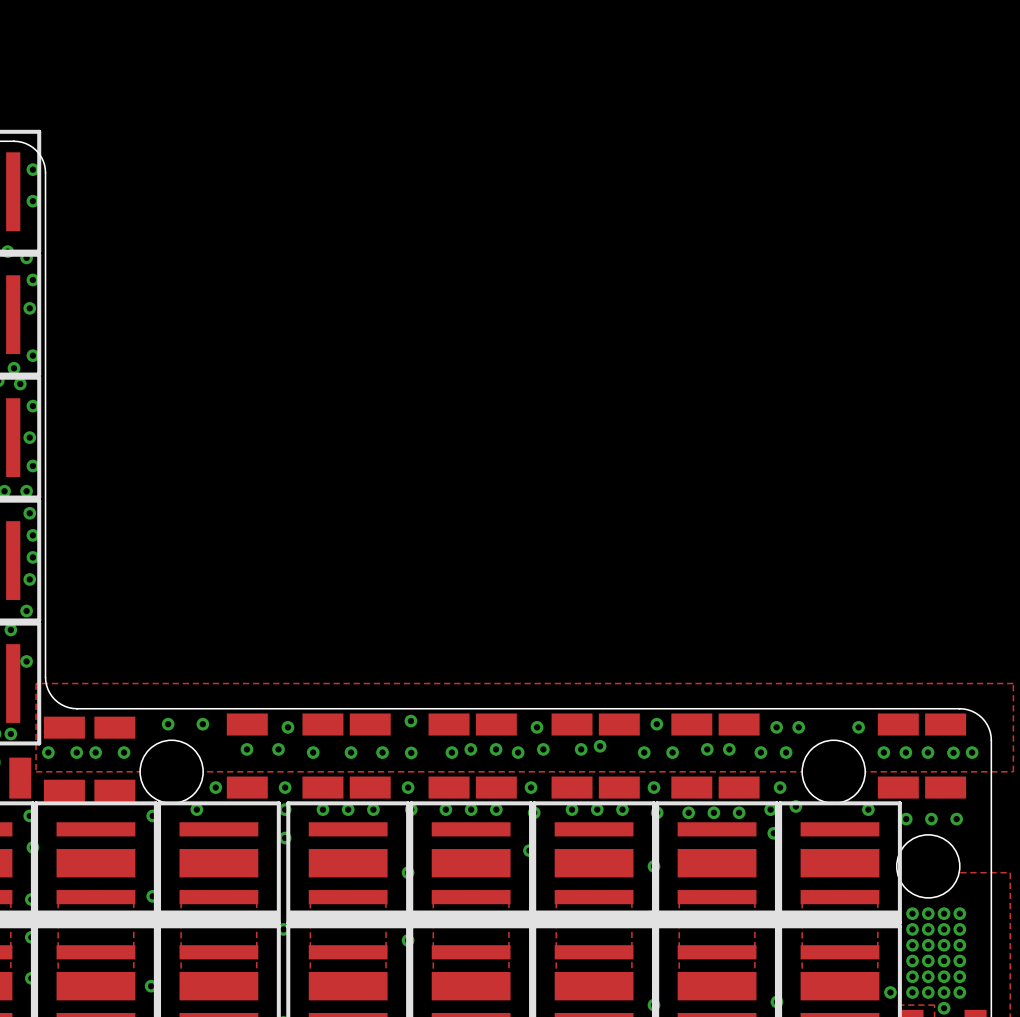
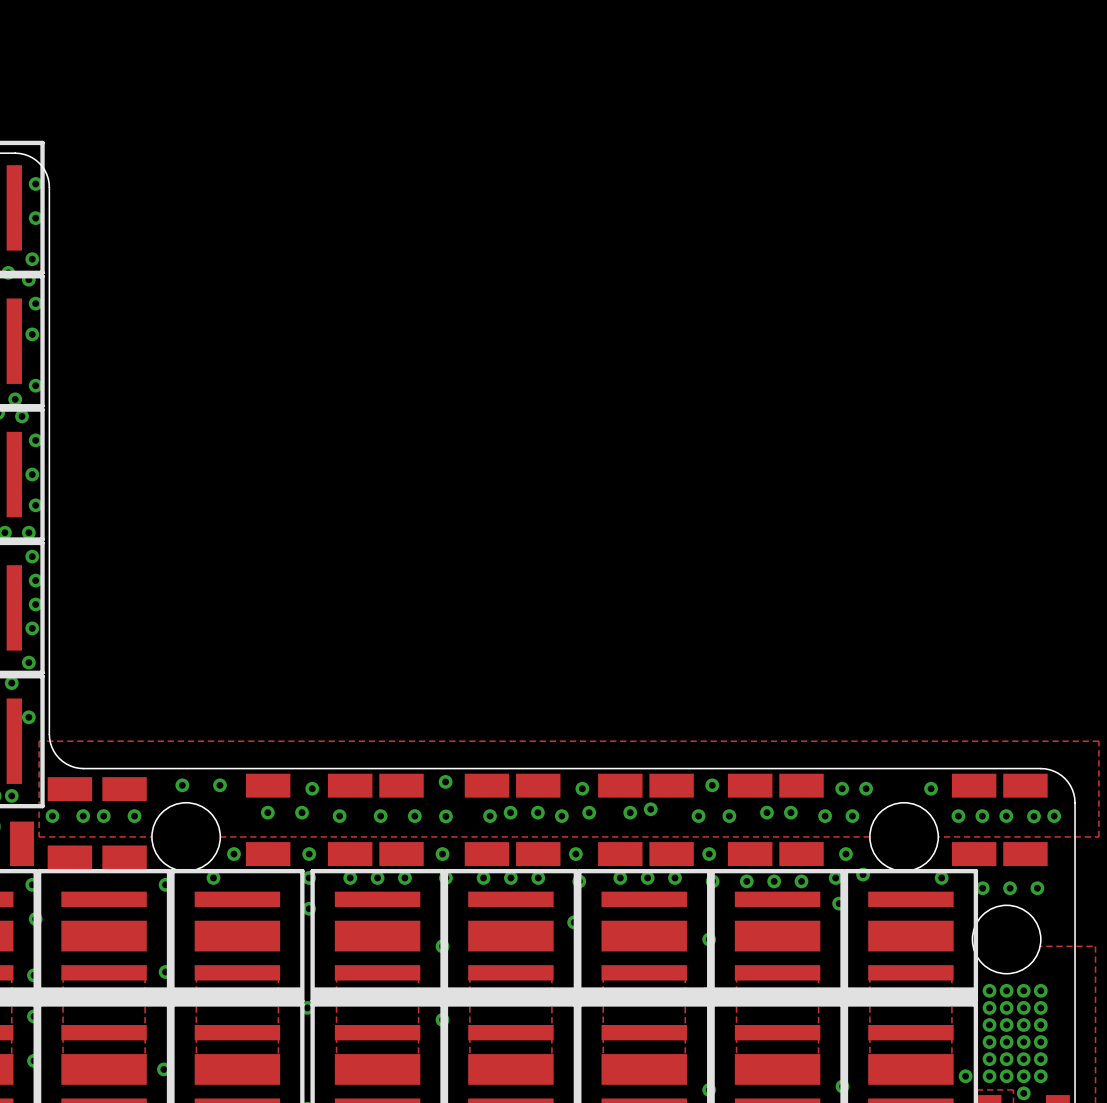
via: none -> (32, 259)

